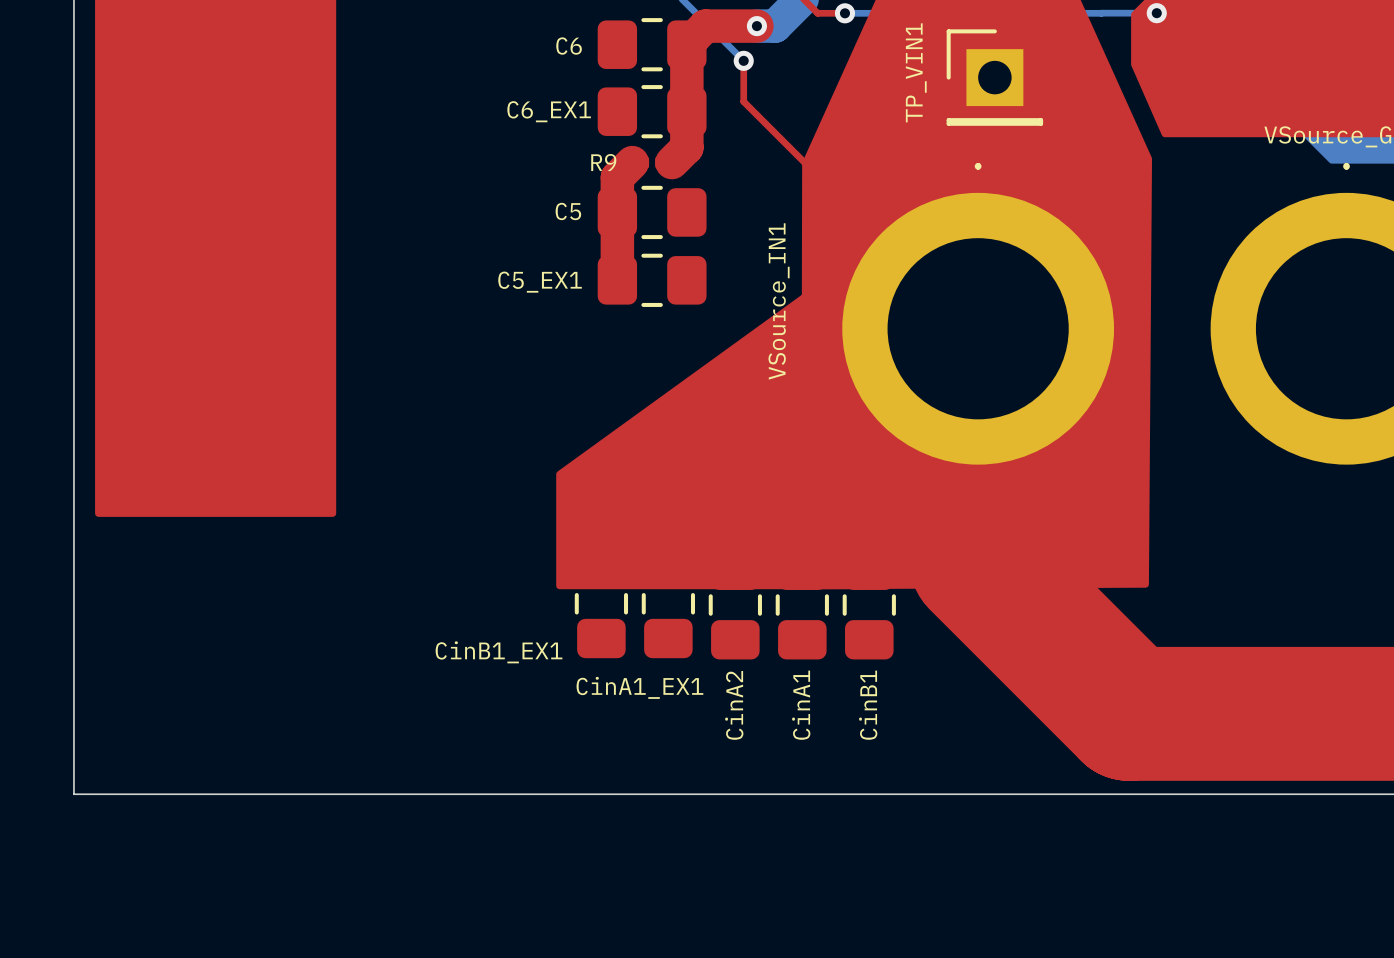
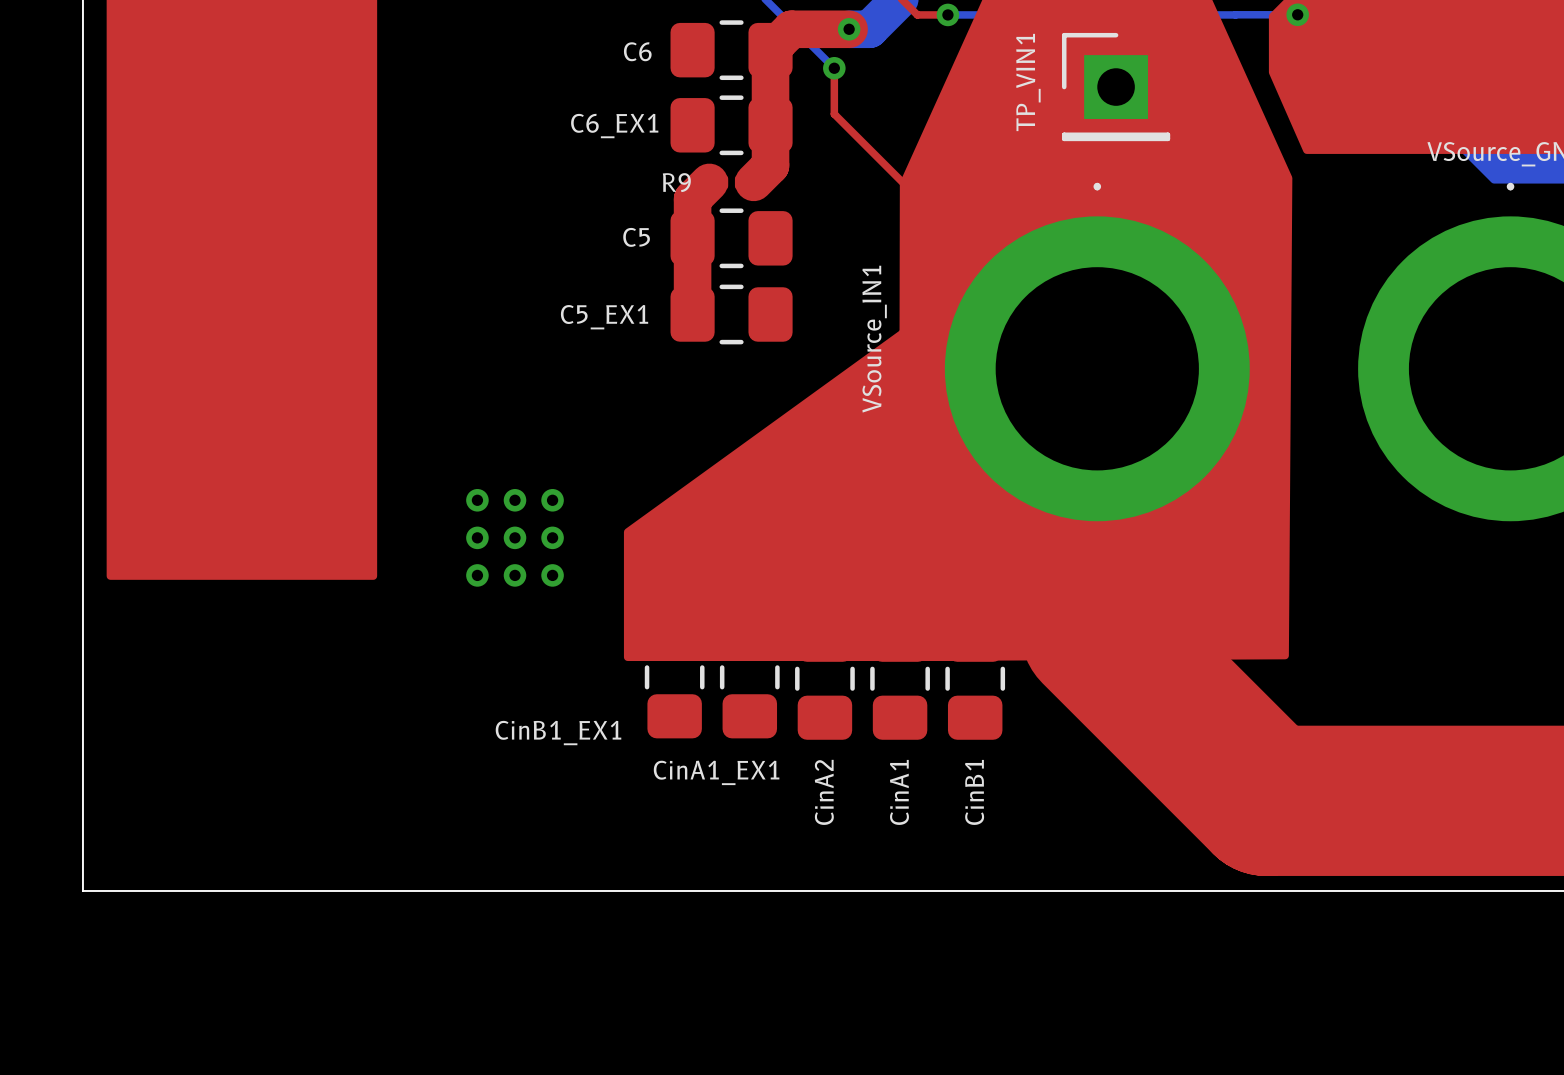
via: none -> (477, 500)
via: none -> (515, 500)
via: none -> (552, 500)
via: none -> (477, 537)
via: none -> (515, 537)
via: none -> (552, 537)
via: none -> (477, 575)
via: none -> (515, 575)
via: none -> (552, 575)

